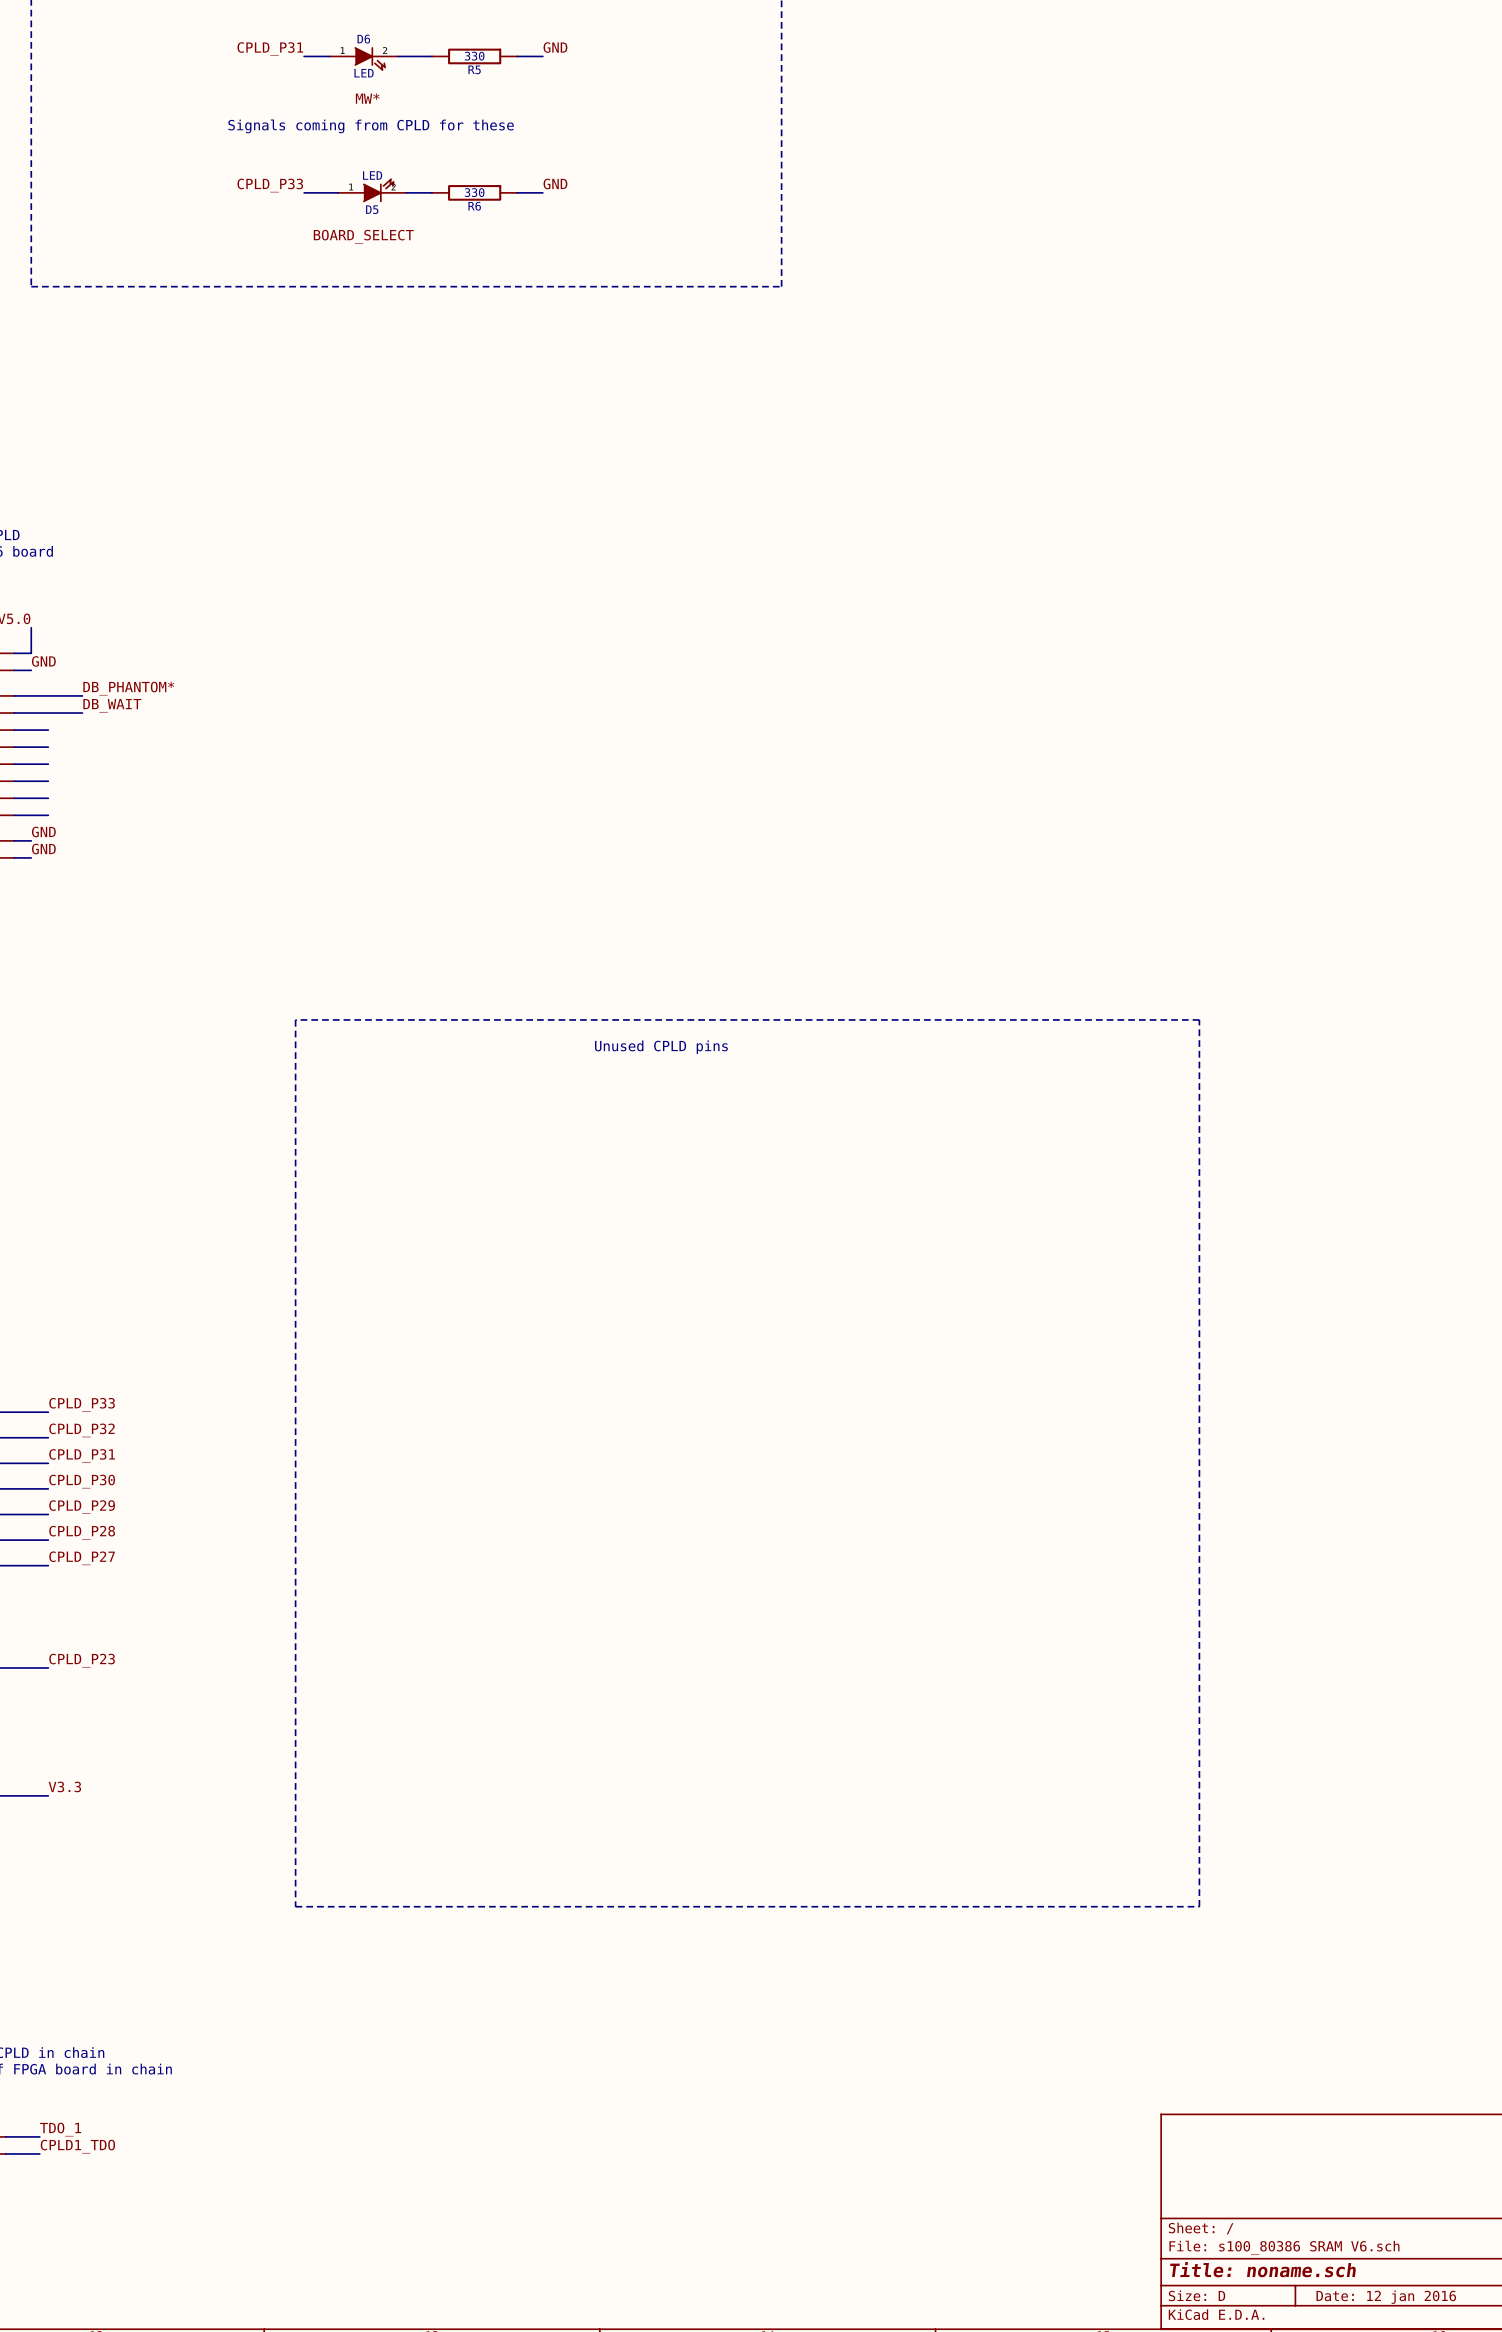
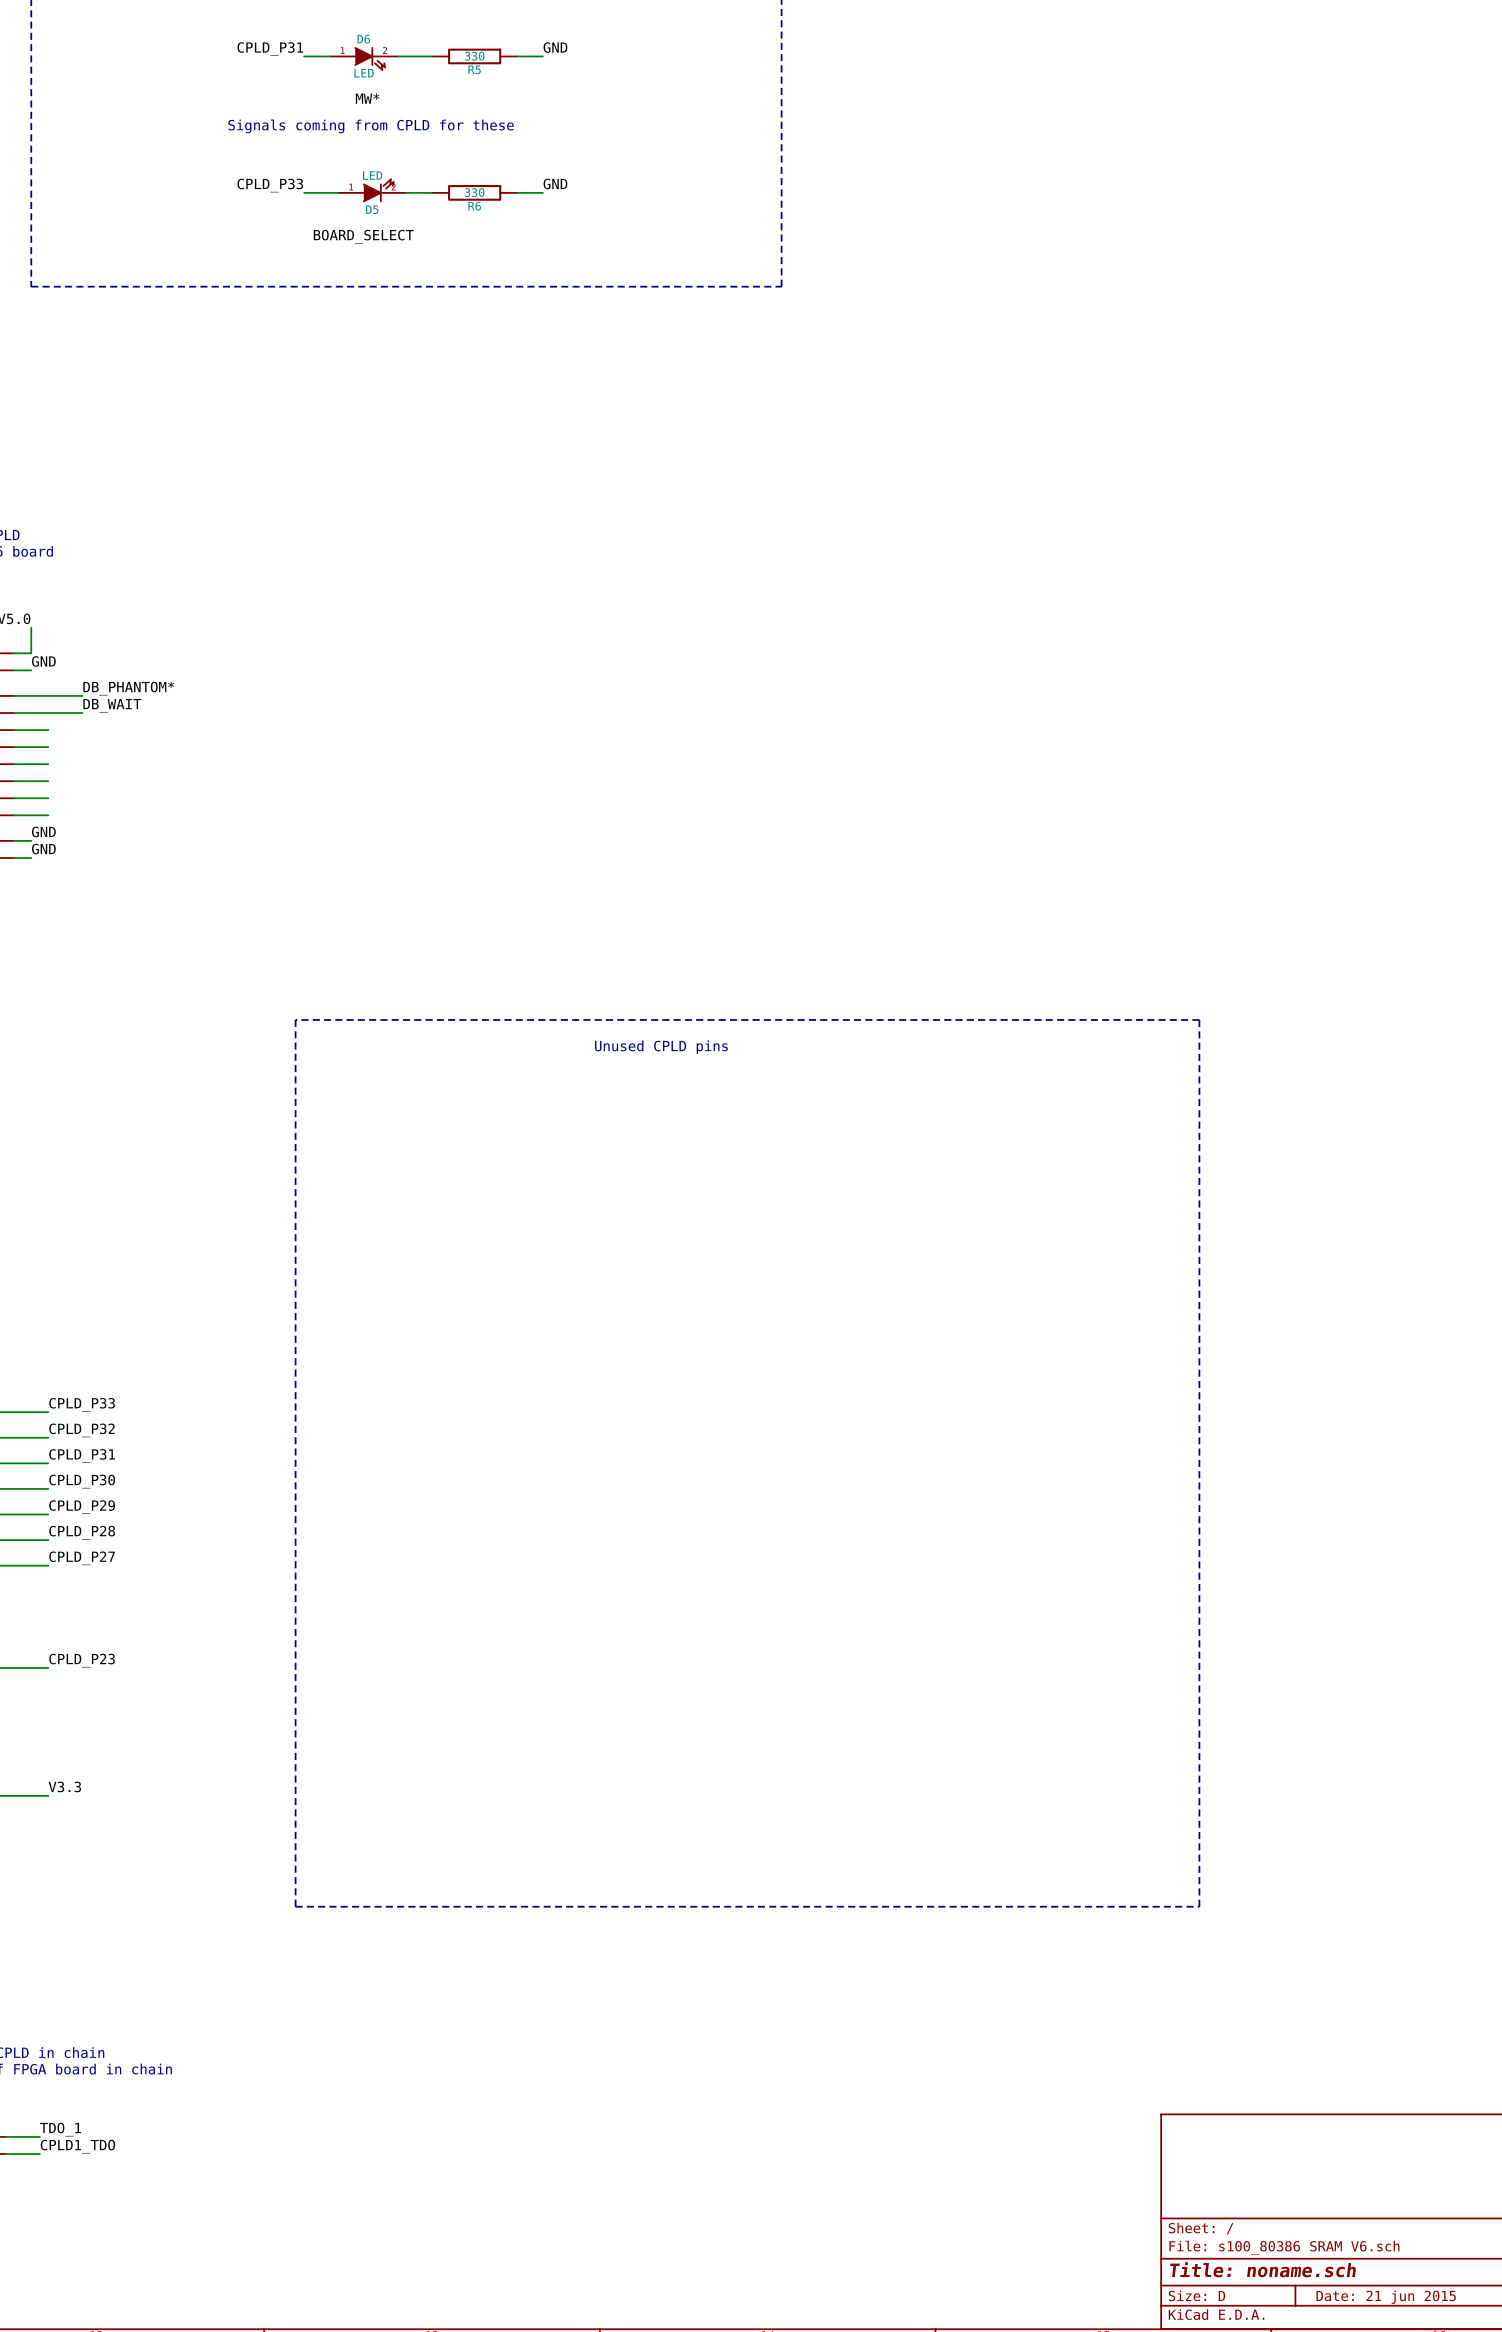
title block: Date: 12 jan 2016 (1386, 2297) -> Date: 21 jun 2015 (1386, 2297)

